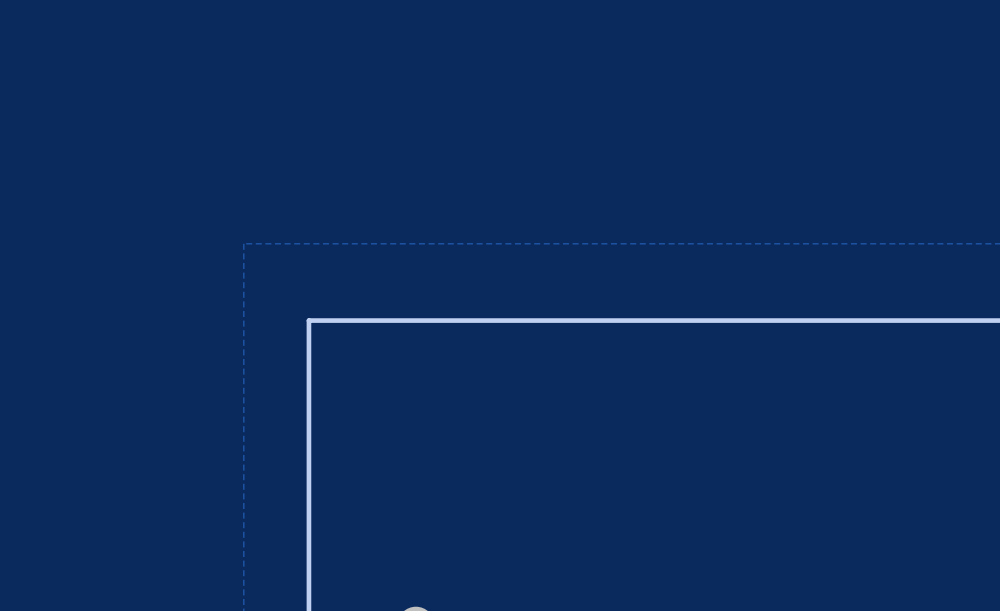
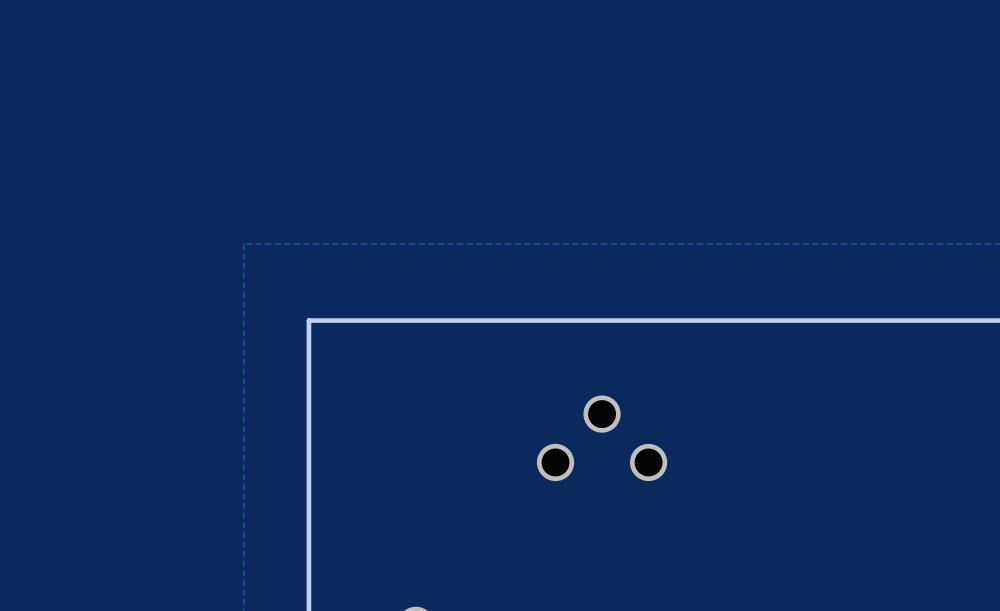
via: none -> (602, 414)
via: none -> (555, 462)
via: none -> (648, 462)

